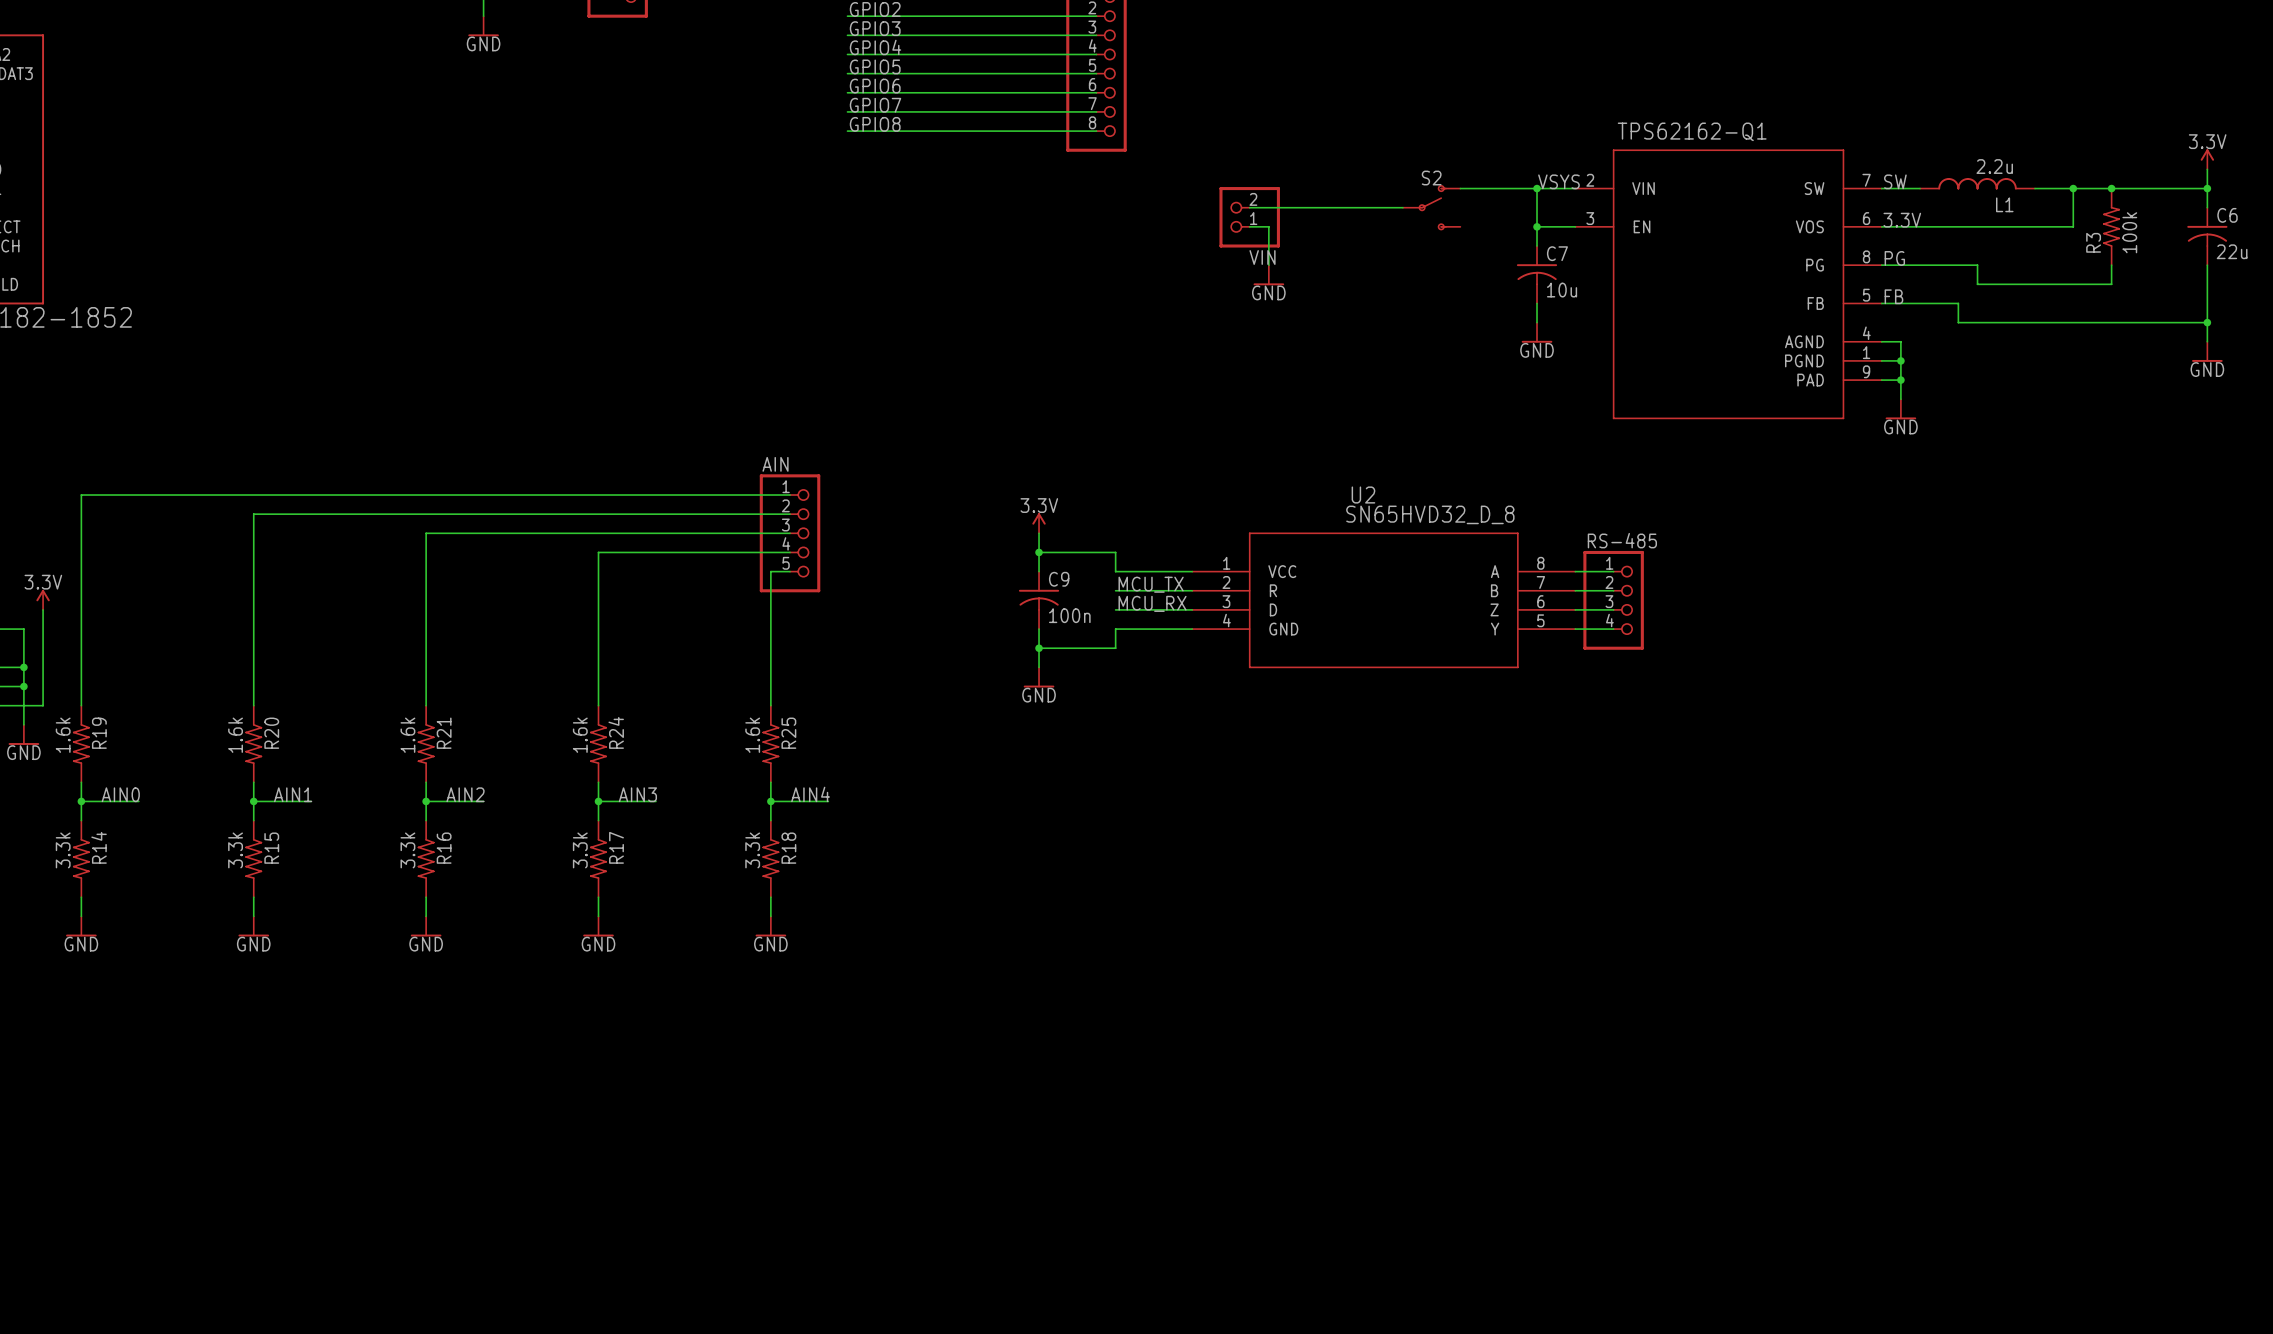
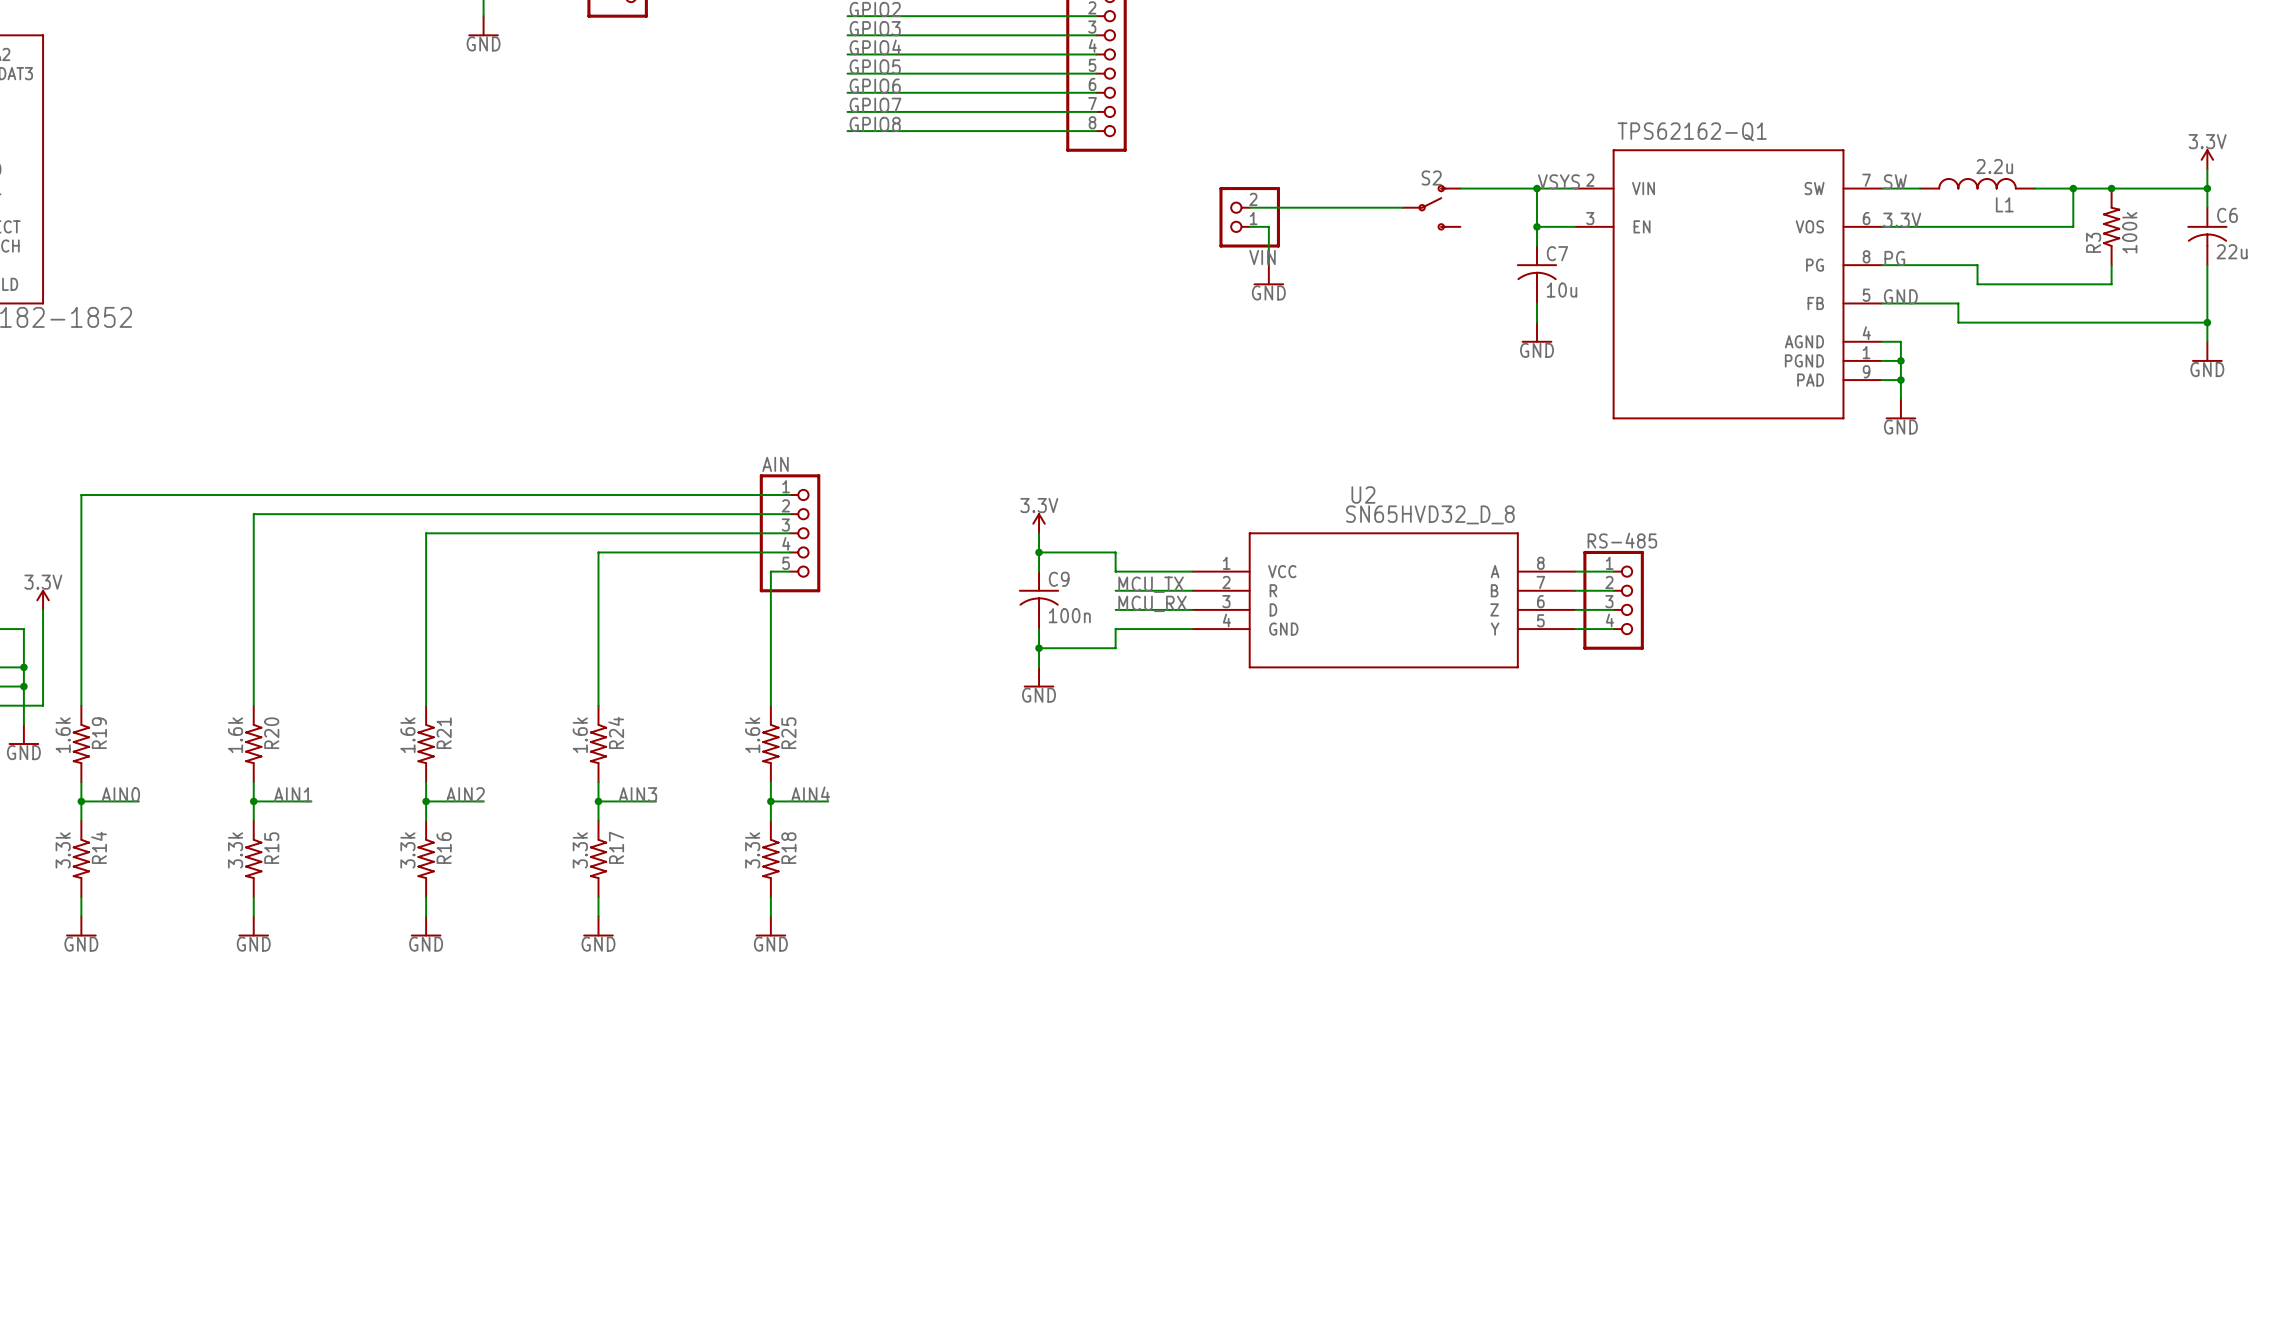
label: FB (1893, 296) -> GND (1900, 296)

